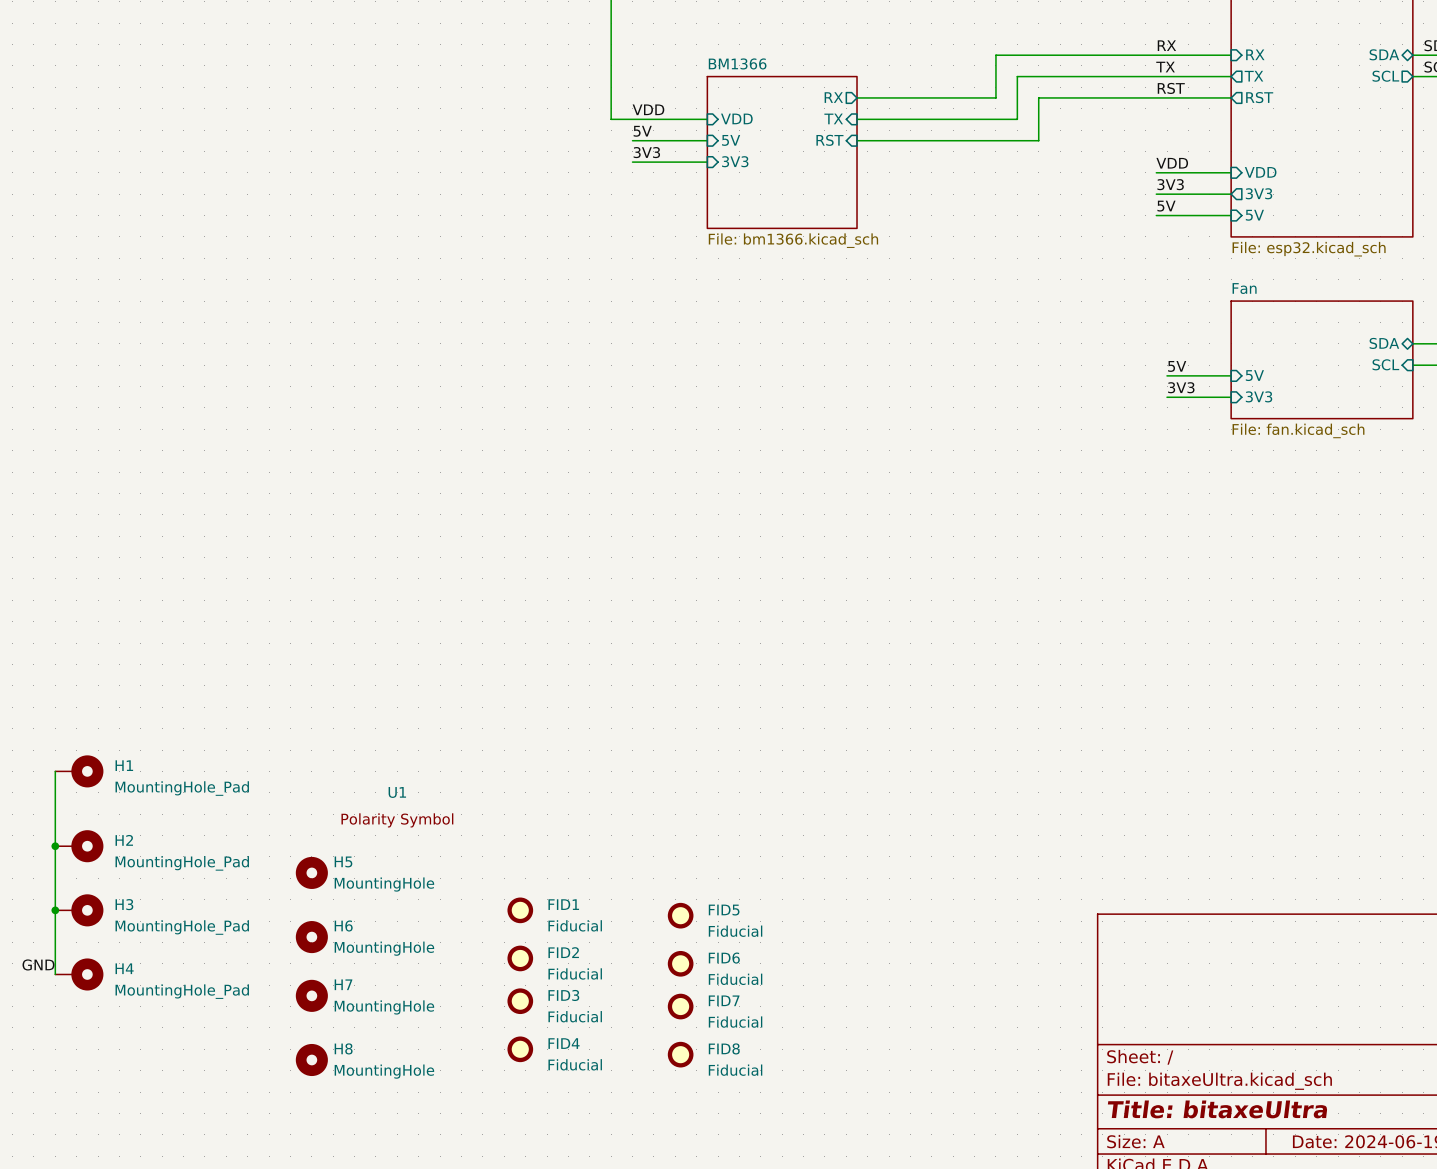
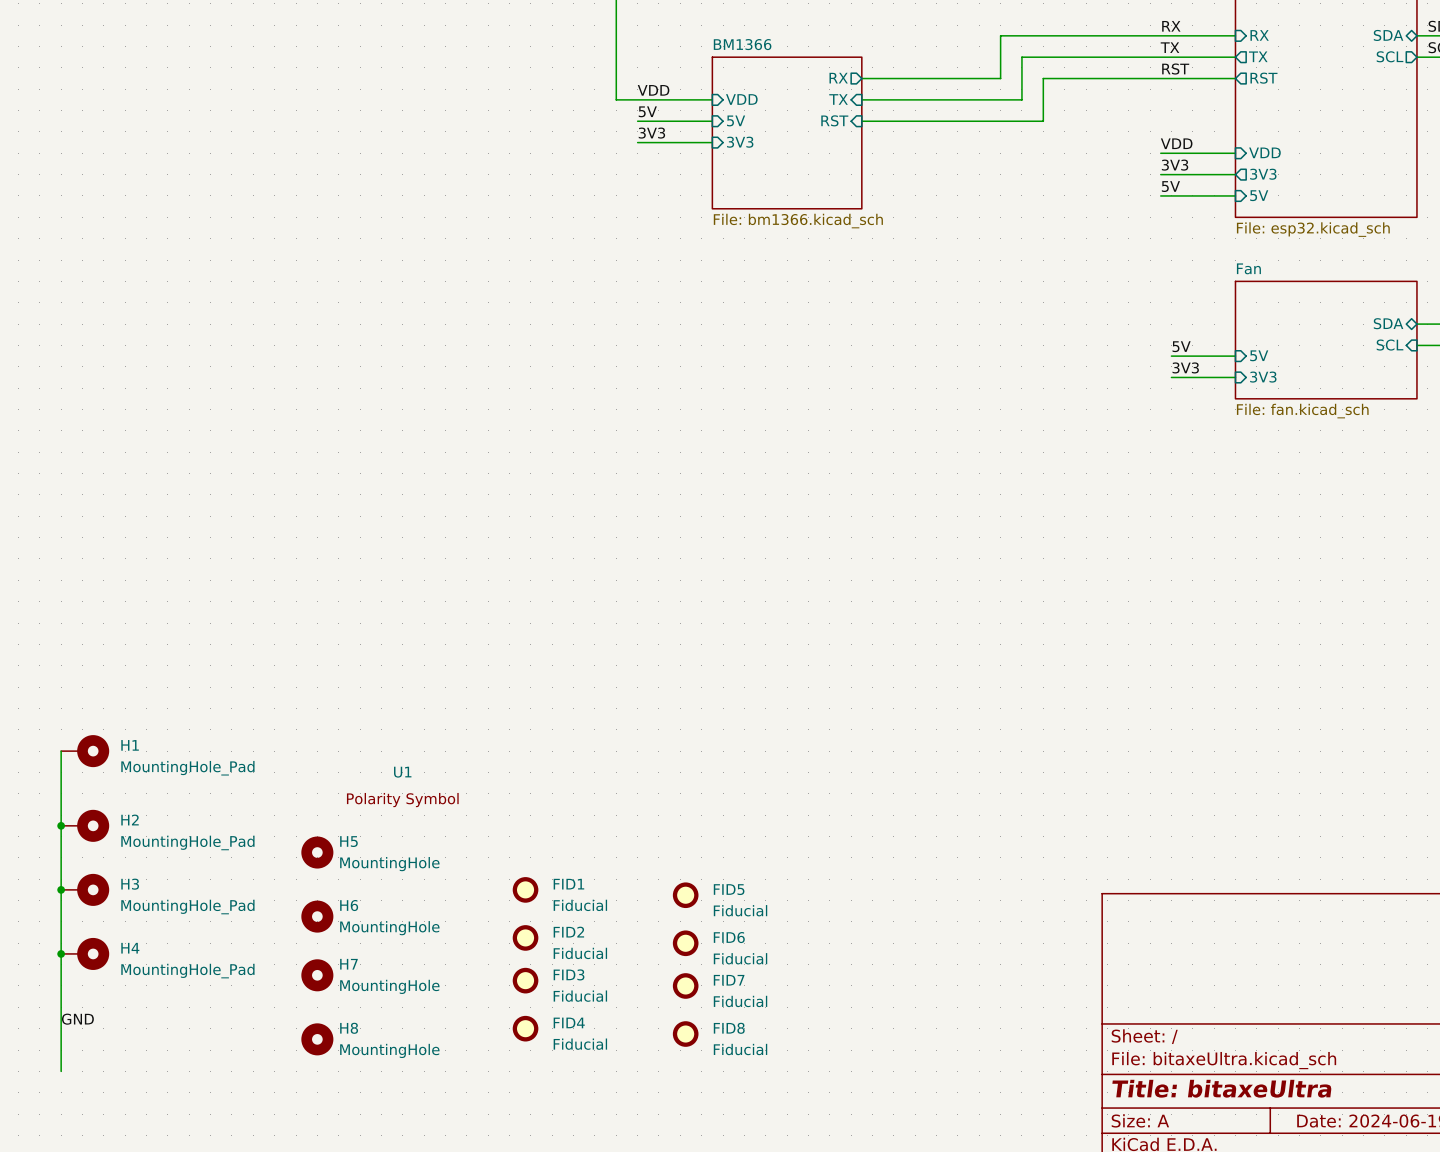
label position: GND (38, 964) -> GND (77, 1019)
wire: none -> (61, 953) (61, 1071)
junction: none -> (61, 953)

